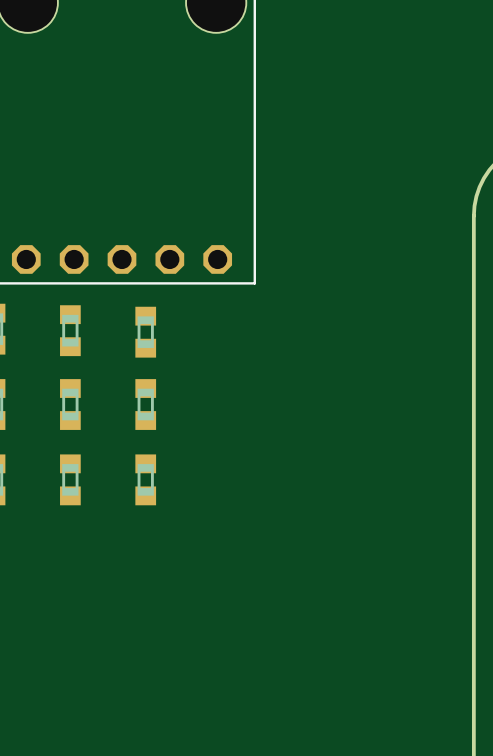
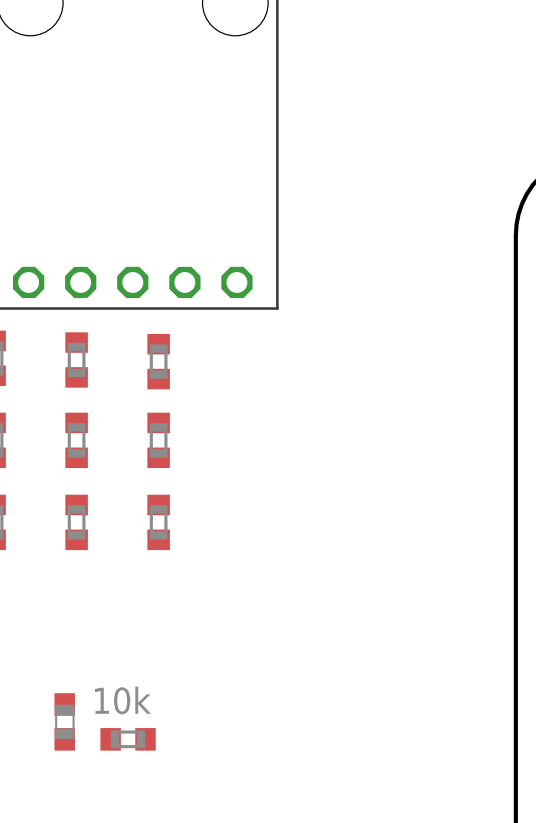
part: none -> (64, 721)
part: none -> 10k (128, 739)

